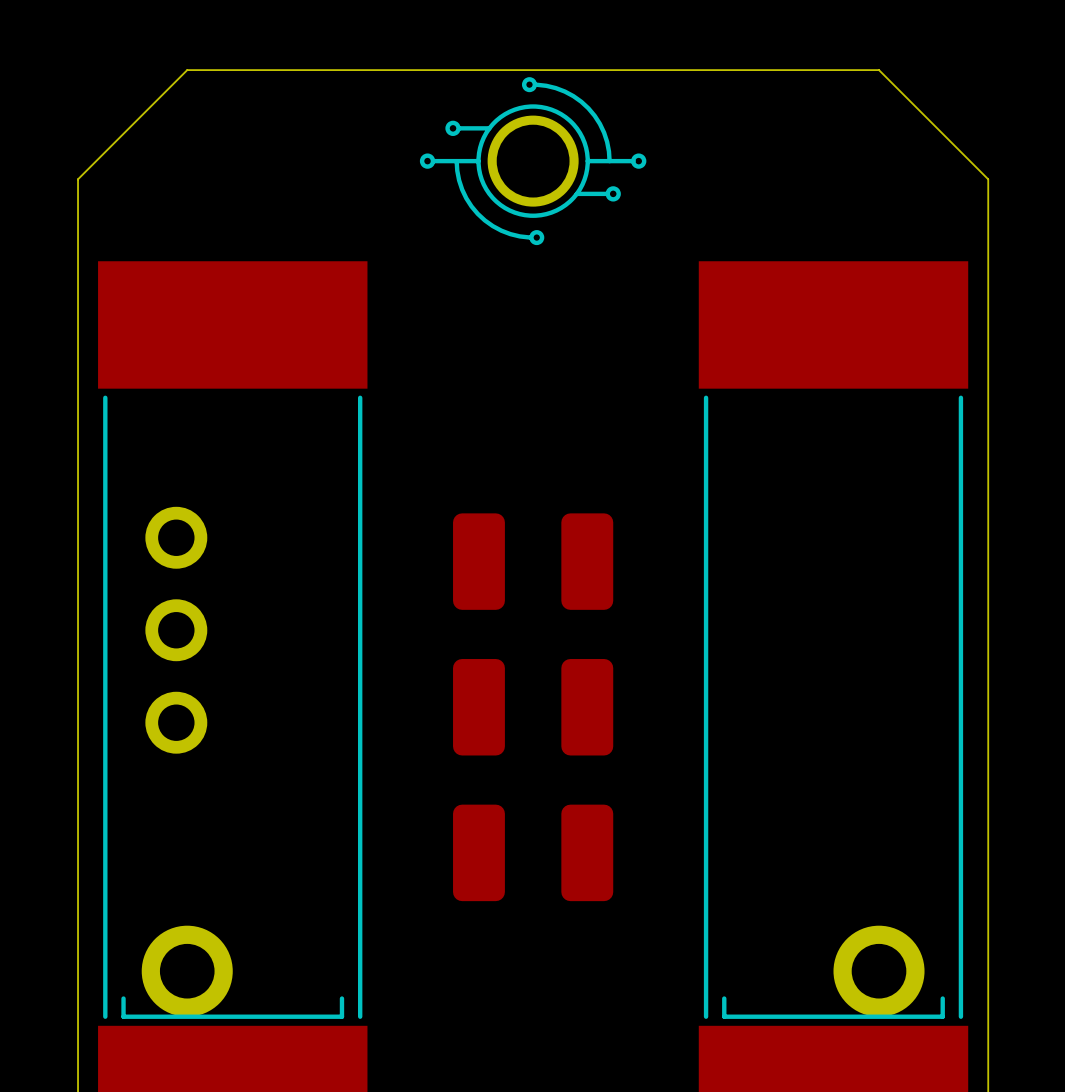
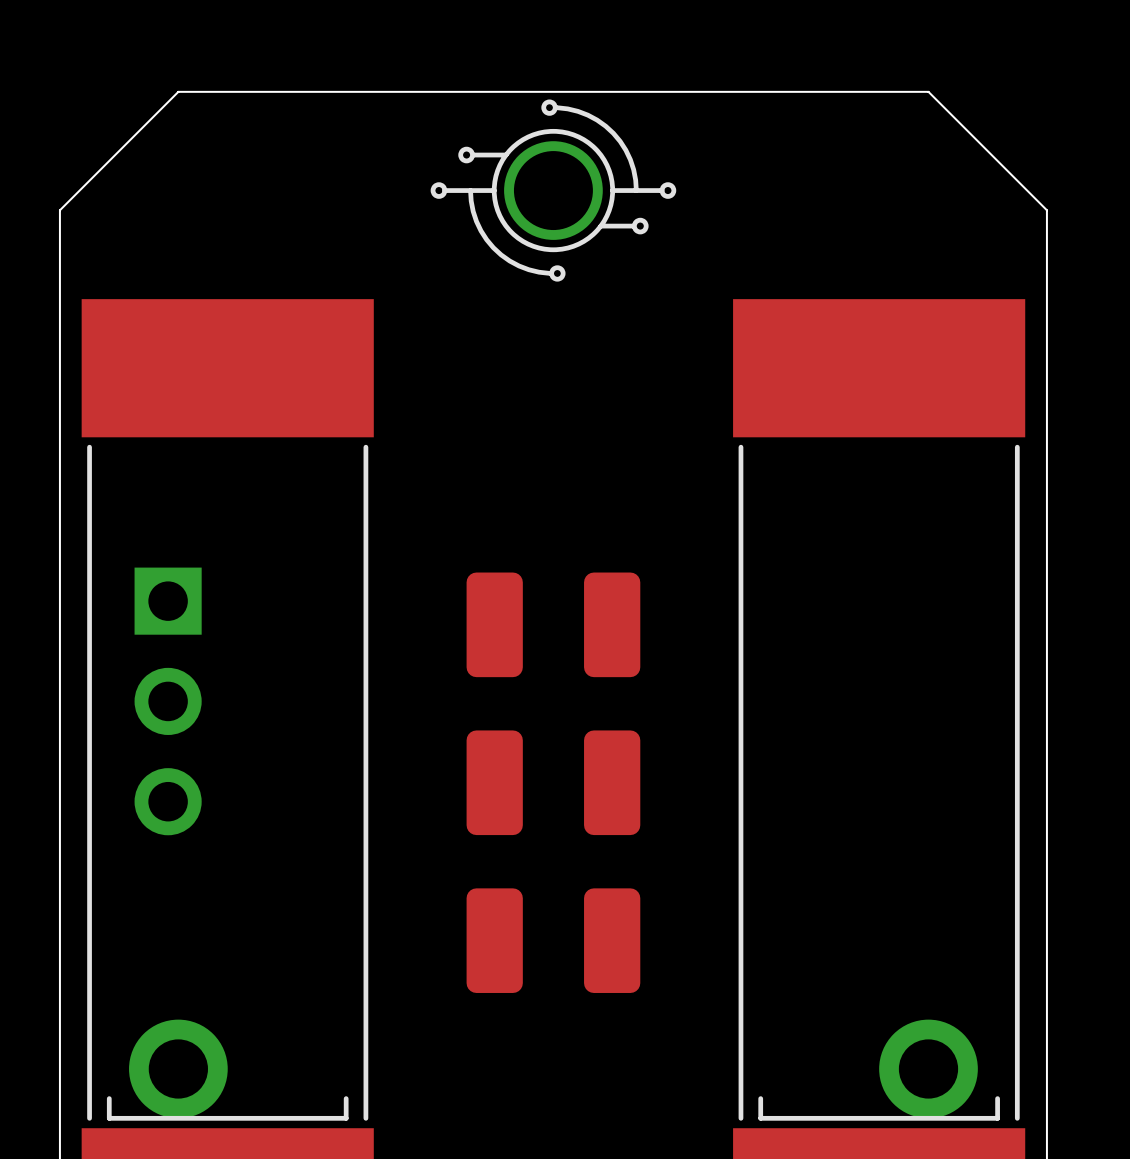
part footprint: [145, 506, 208, 754] -> [134, 567, 202, 836]

